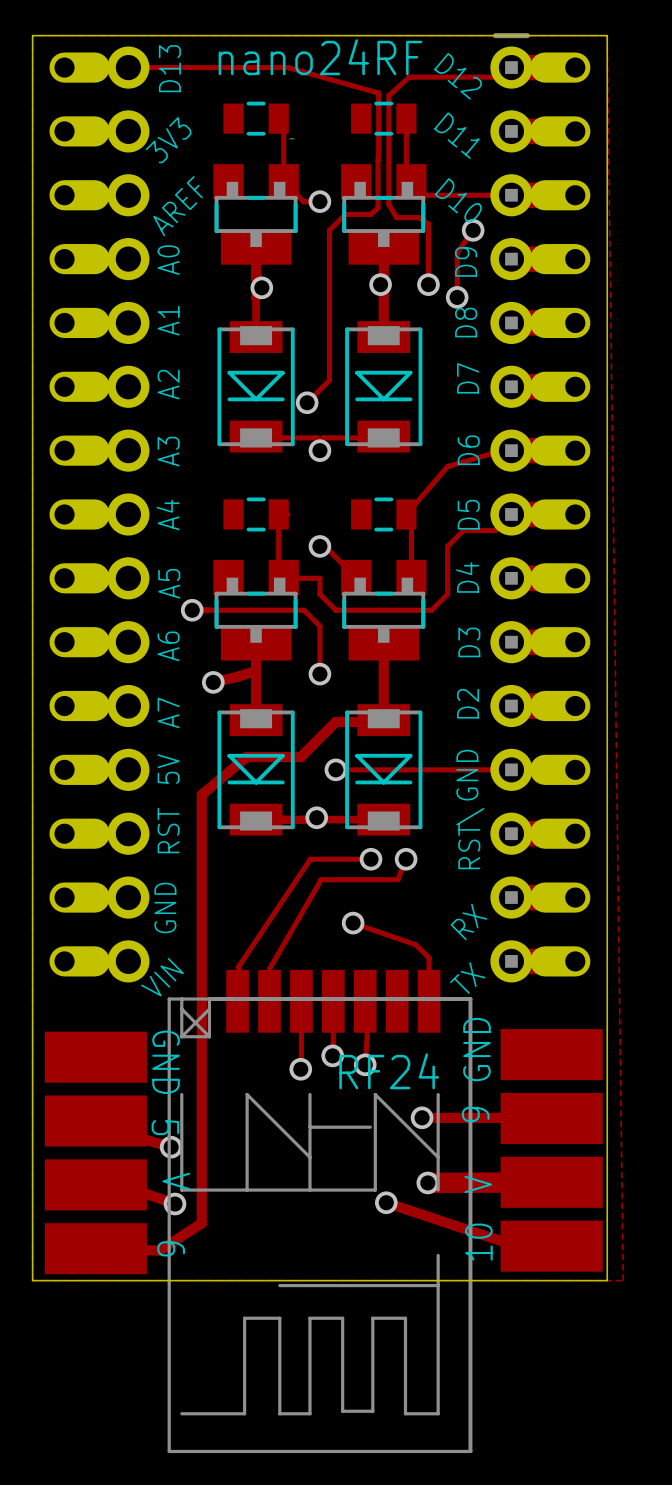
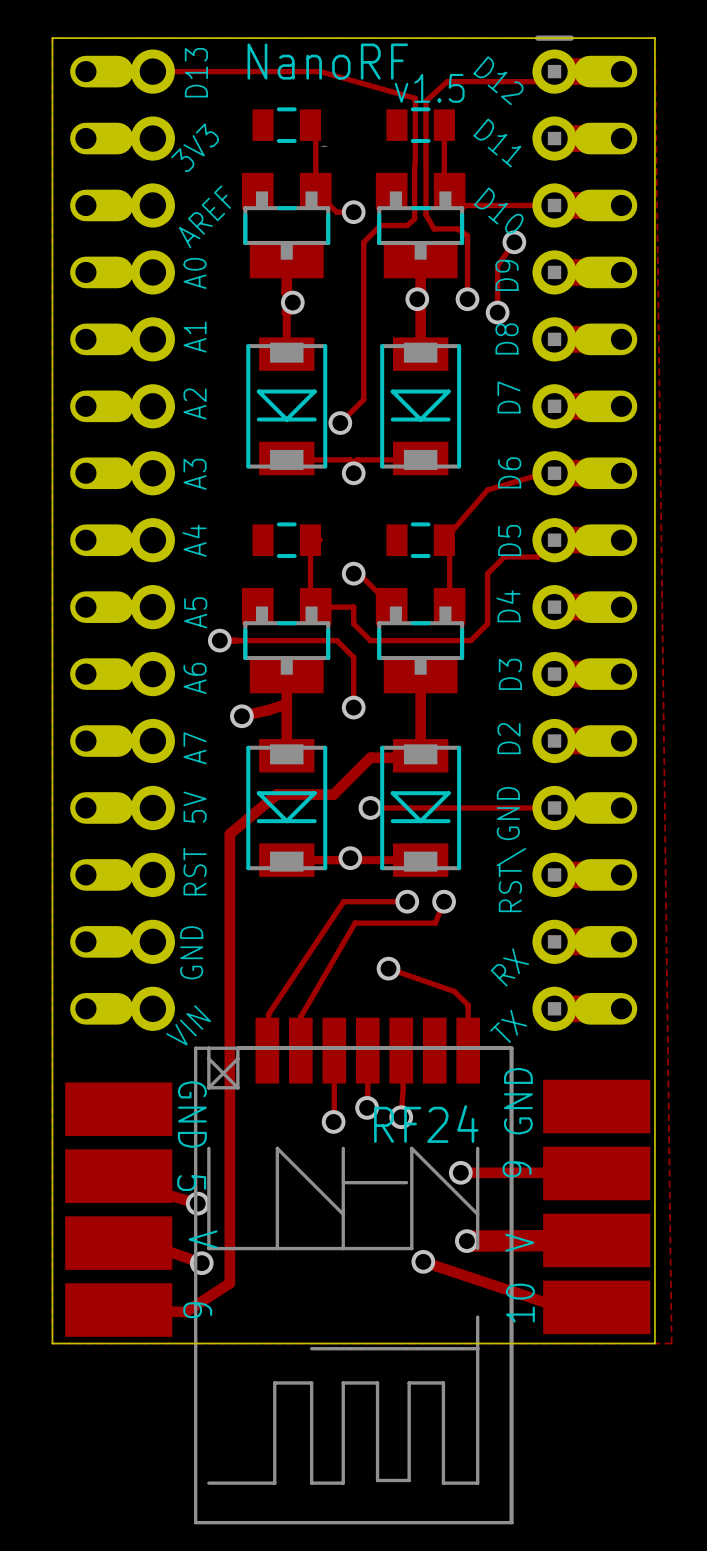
text: nano24RF (320, 57) -> NanoRF (327, 61)
text: none -> v1.5 (429, 88)

